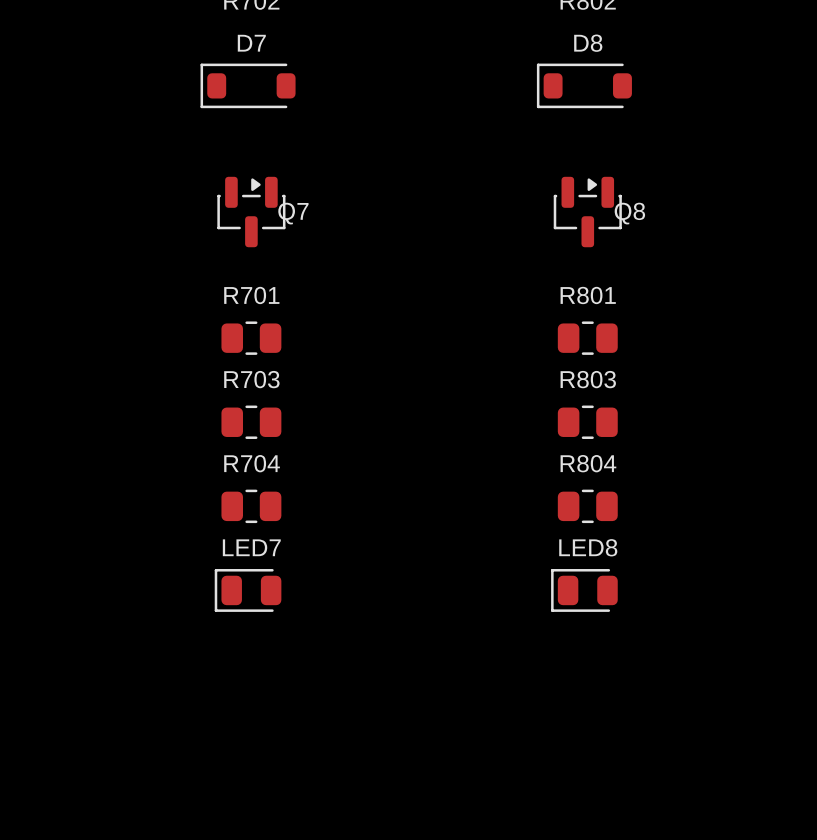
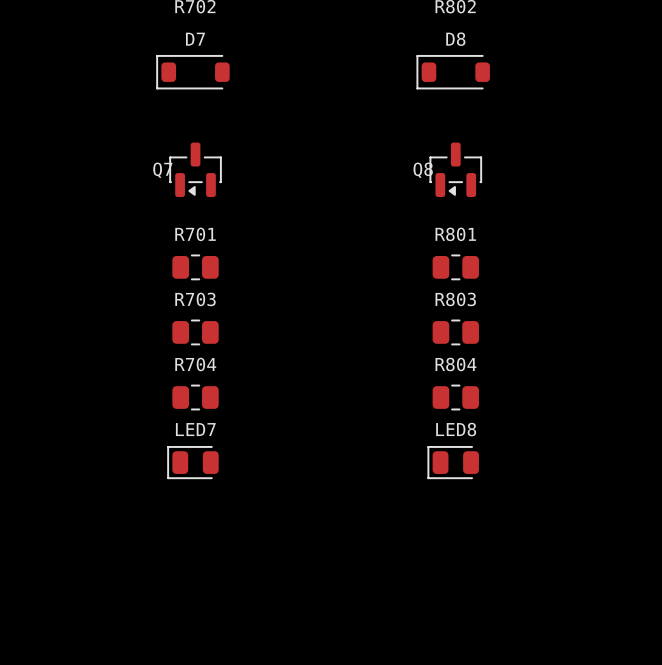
Q7 rotation: 0° (251, 212) -> 180° (195, 169)
Q8 rotation: 0° (587, 212) -> 180° (455, 169)

